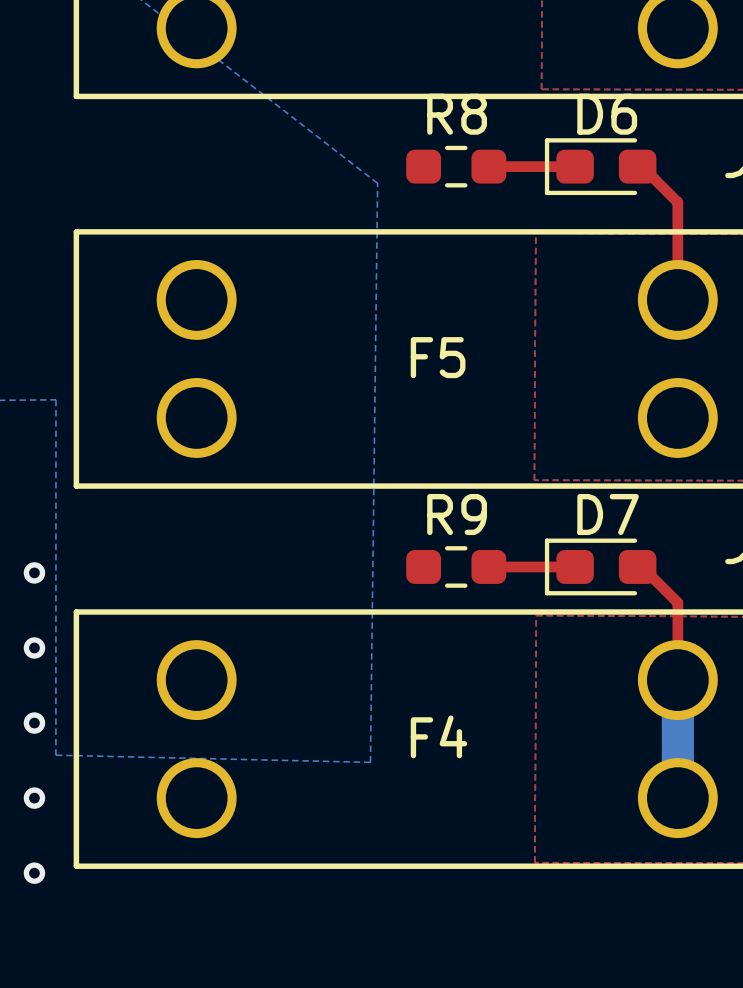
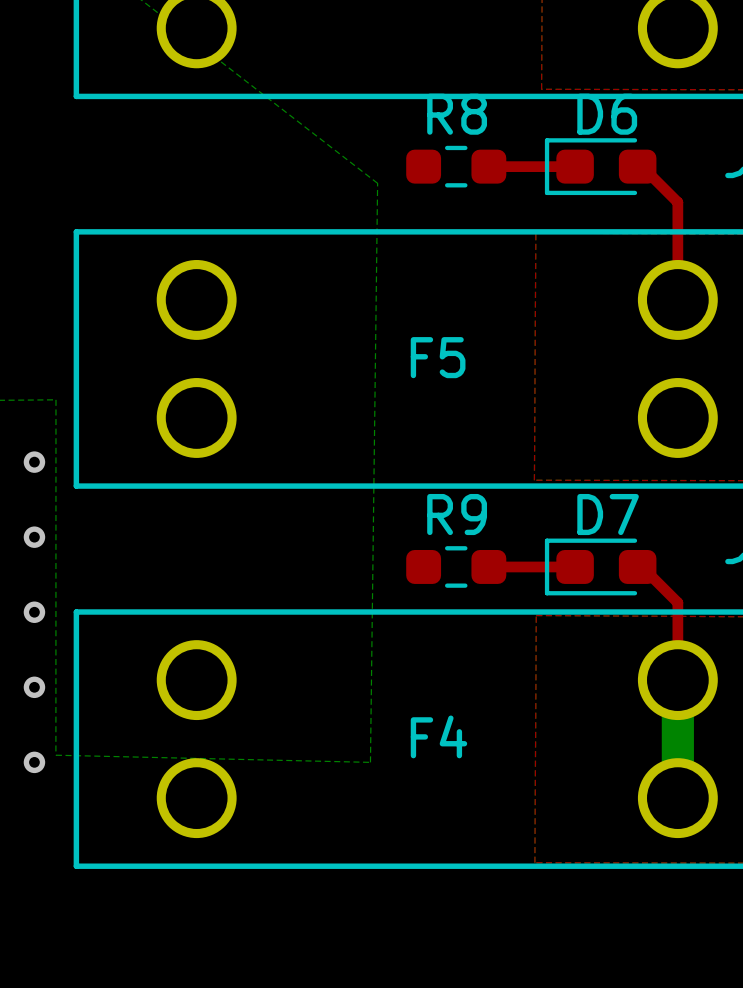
via: none -> (34, 462)
via: none -> (34, 537)
via: (34, 572) -> none
via: none -> (34, 612)
via: (34, 647) -> none
via: none -> (34, 687)
via: (34, 723) -> none
via: none -> (34, 762)
via: (34, 798) -> none
via: (34, 873) -> none

